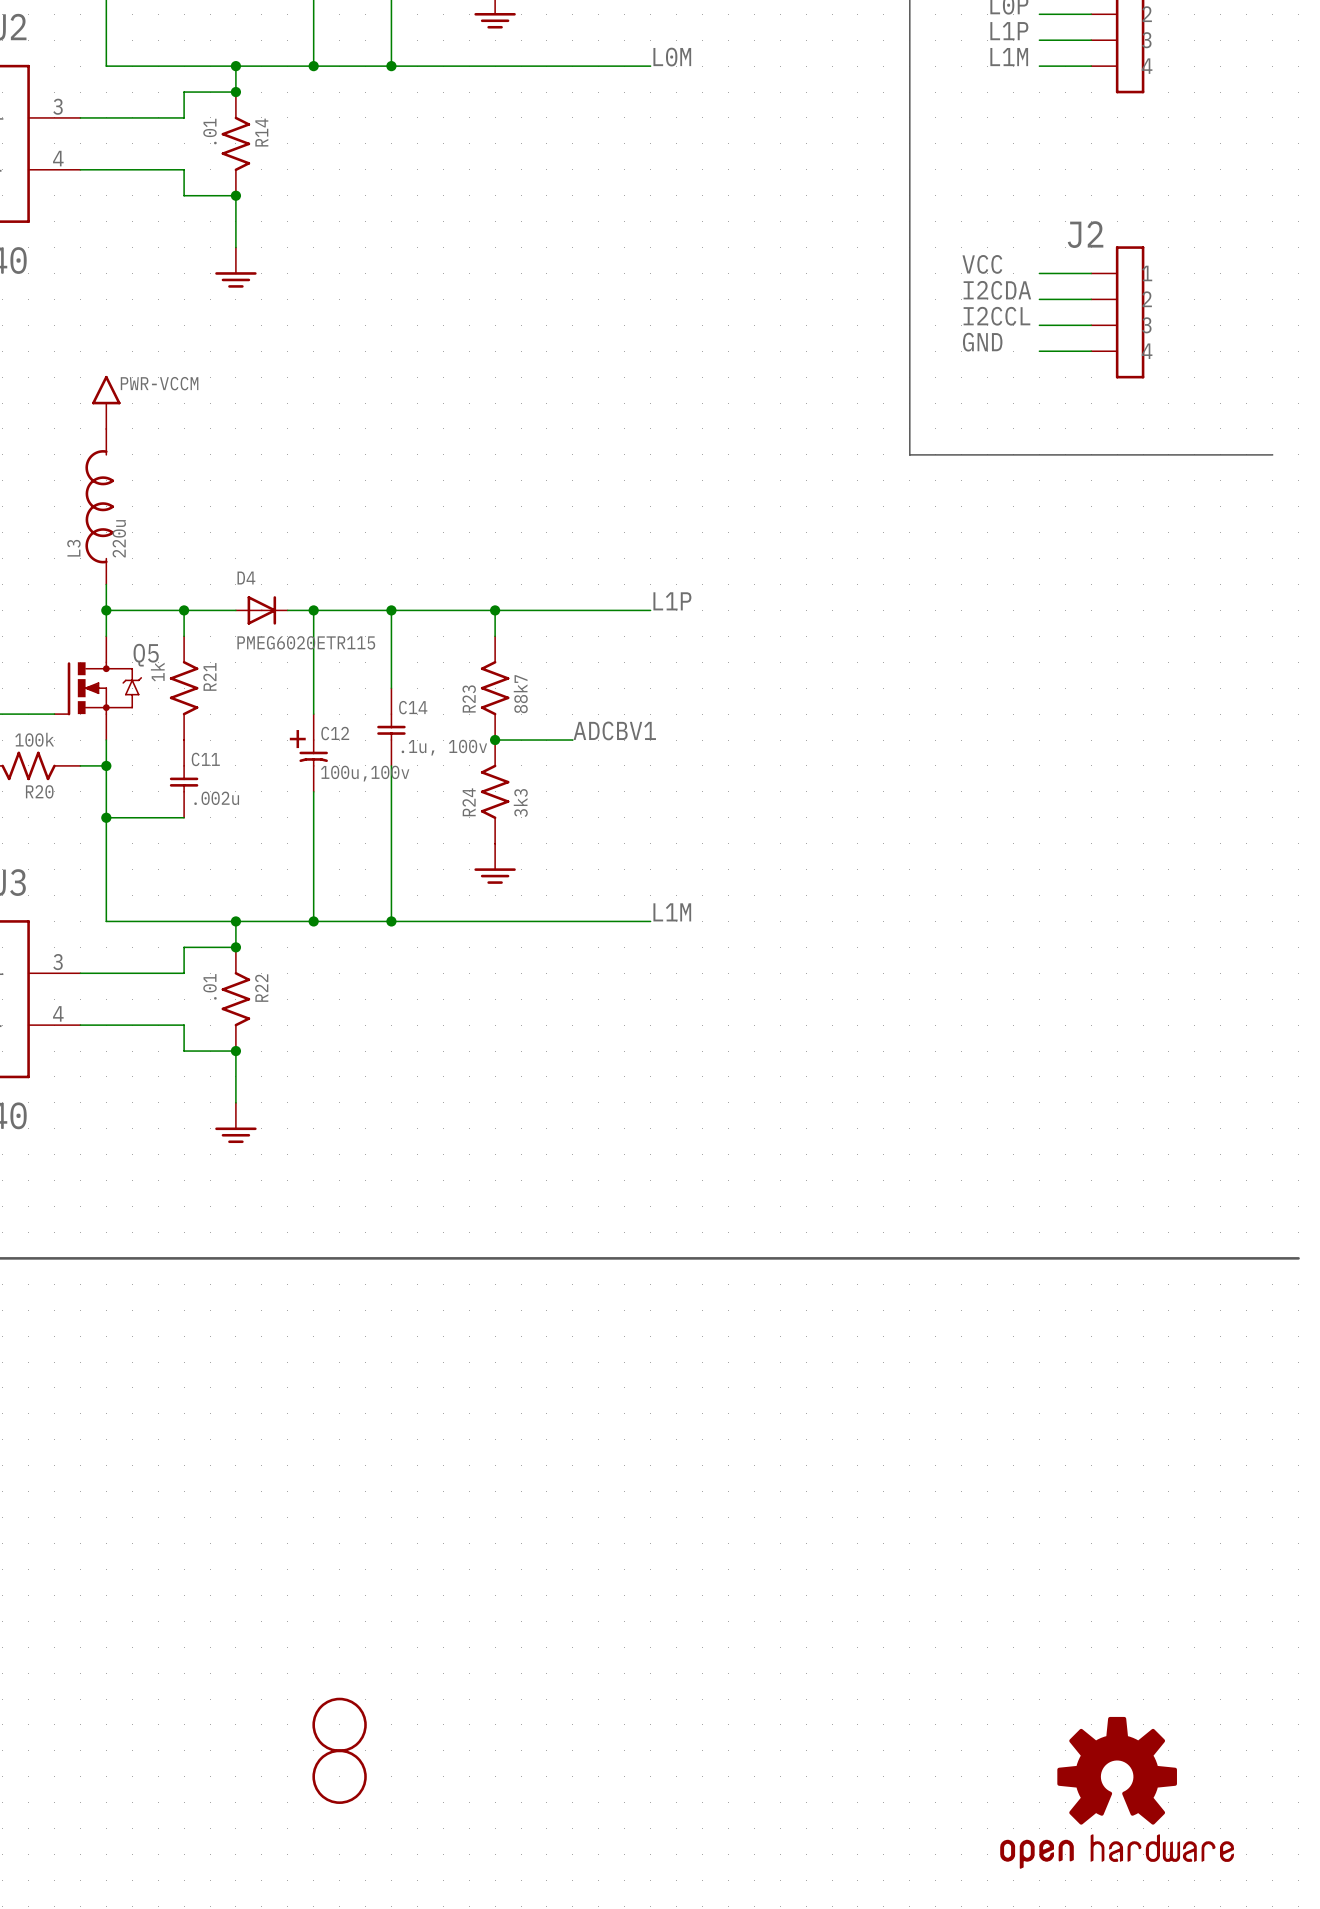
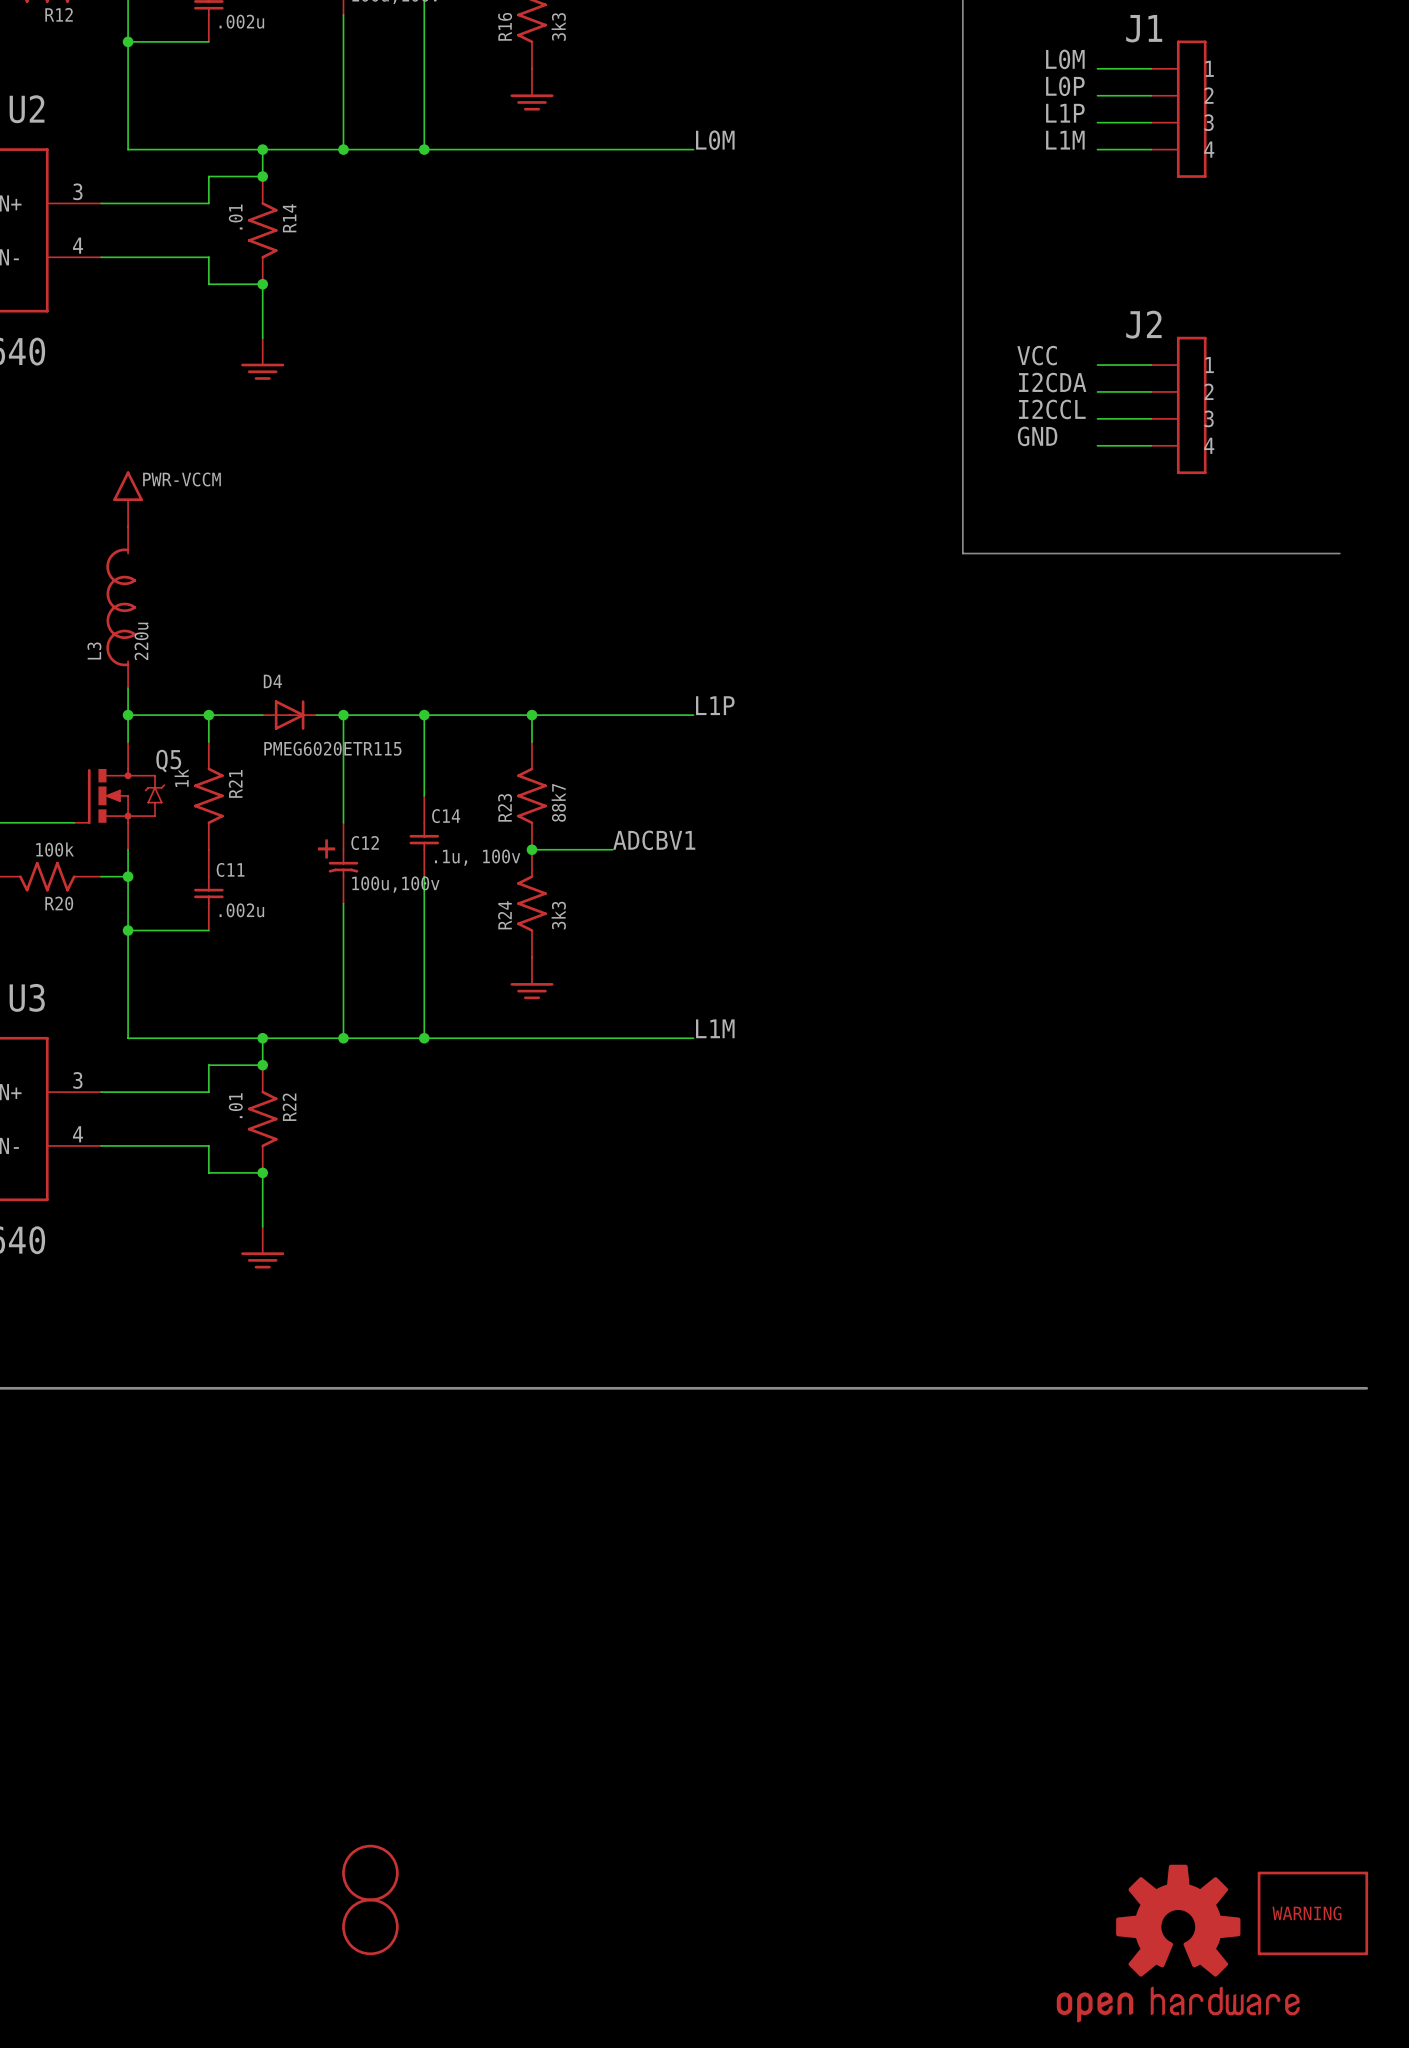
part: none -> (1312, 1913)

